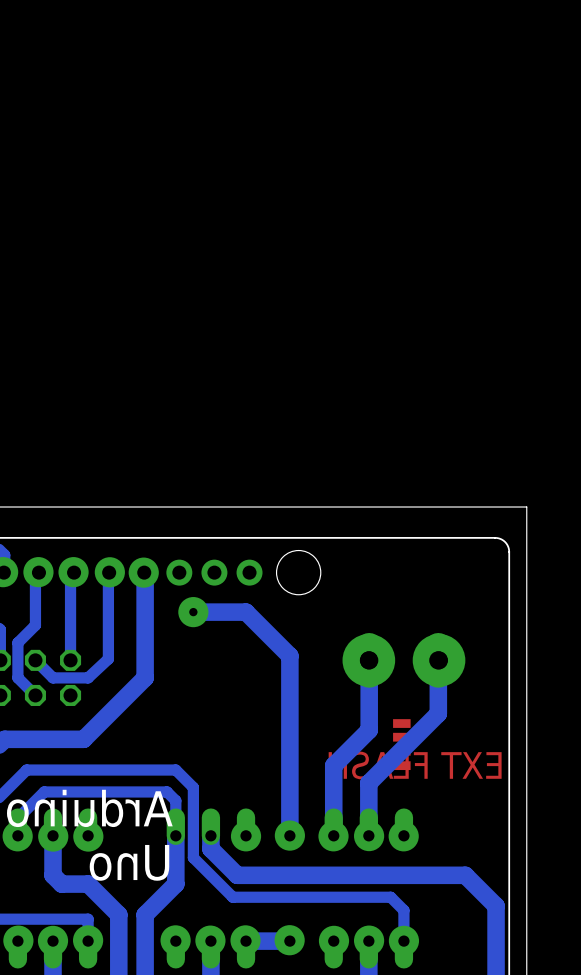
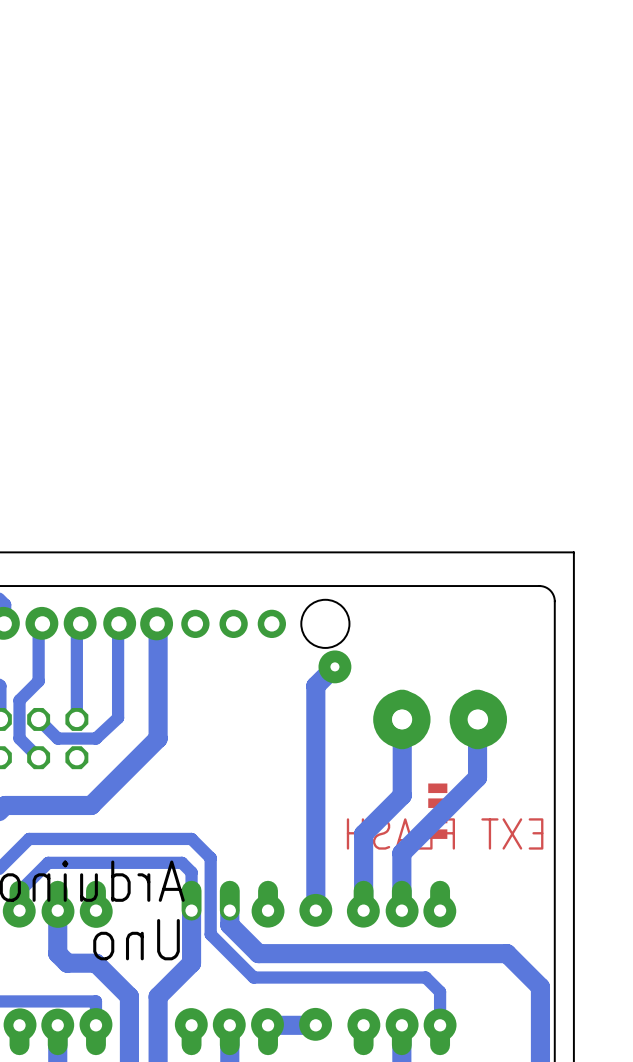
bottom track: (193, 612) (246, 612) (289, 655) -> (334, 666) (315, 686) (315, 714)
via: (193, 612) -> none
via: none -> (334, 666)

